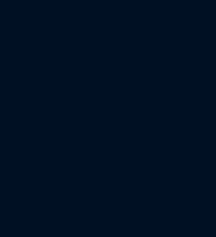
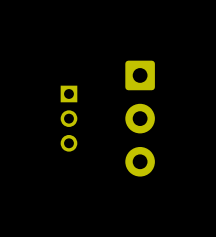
part: none -> (68, 118)
part: none -> (140, 118)

